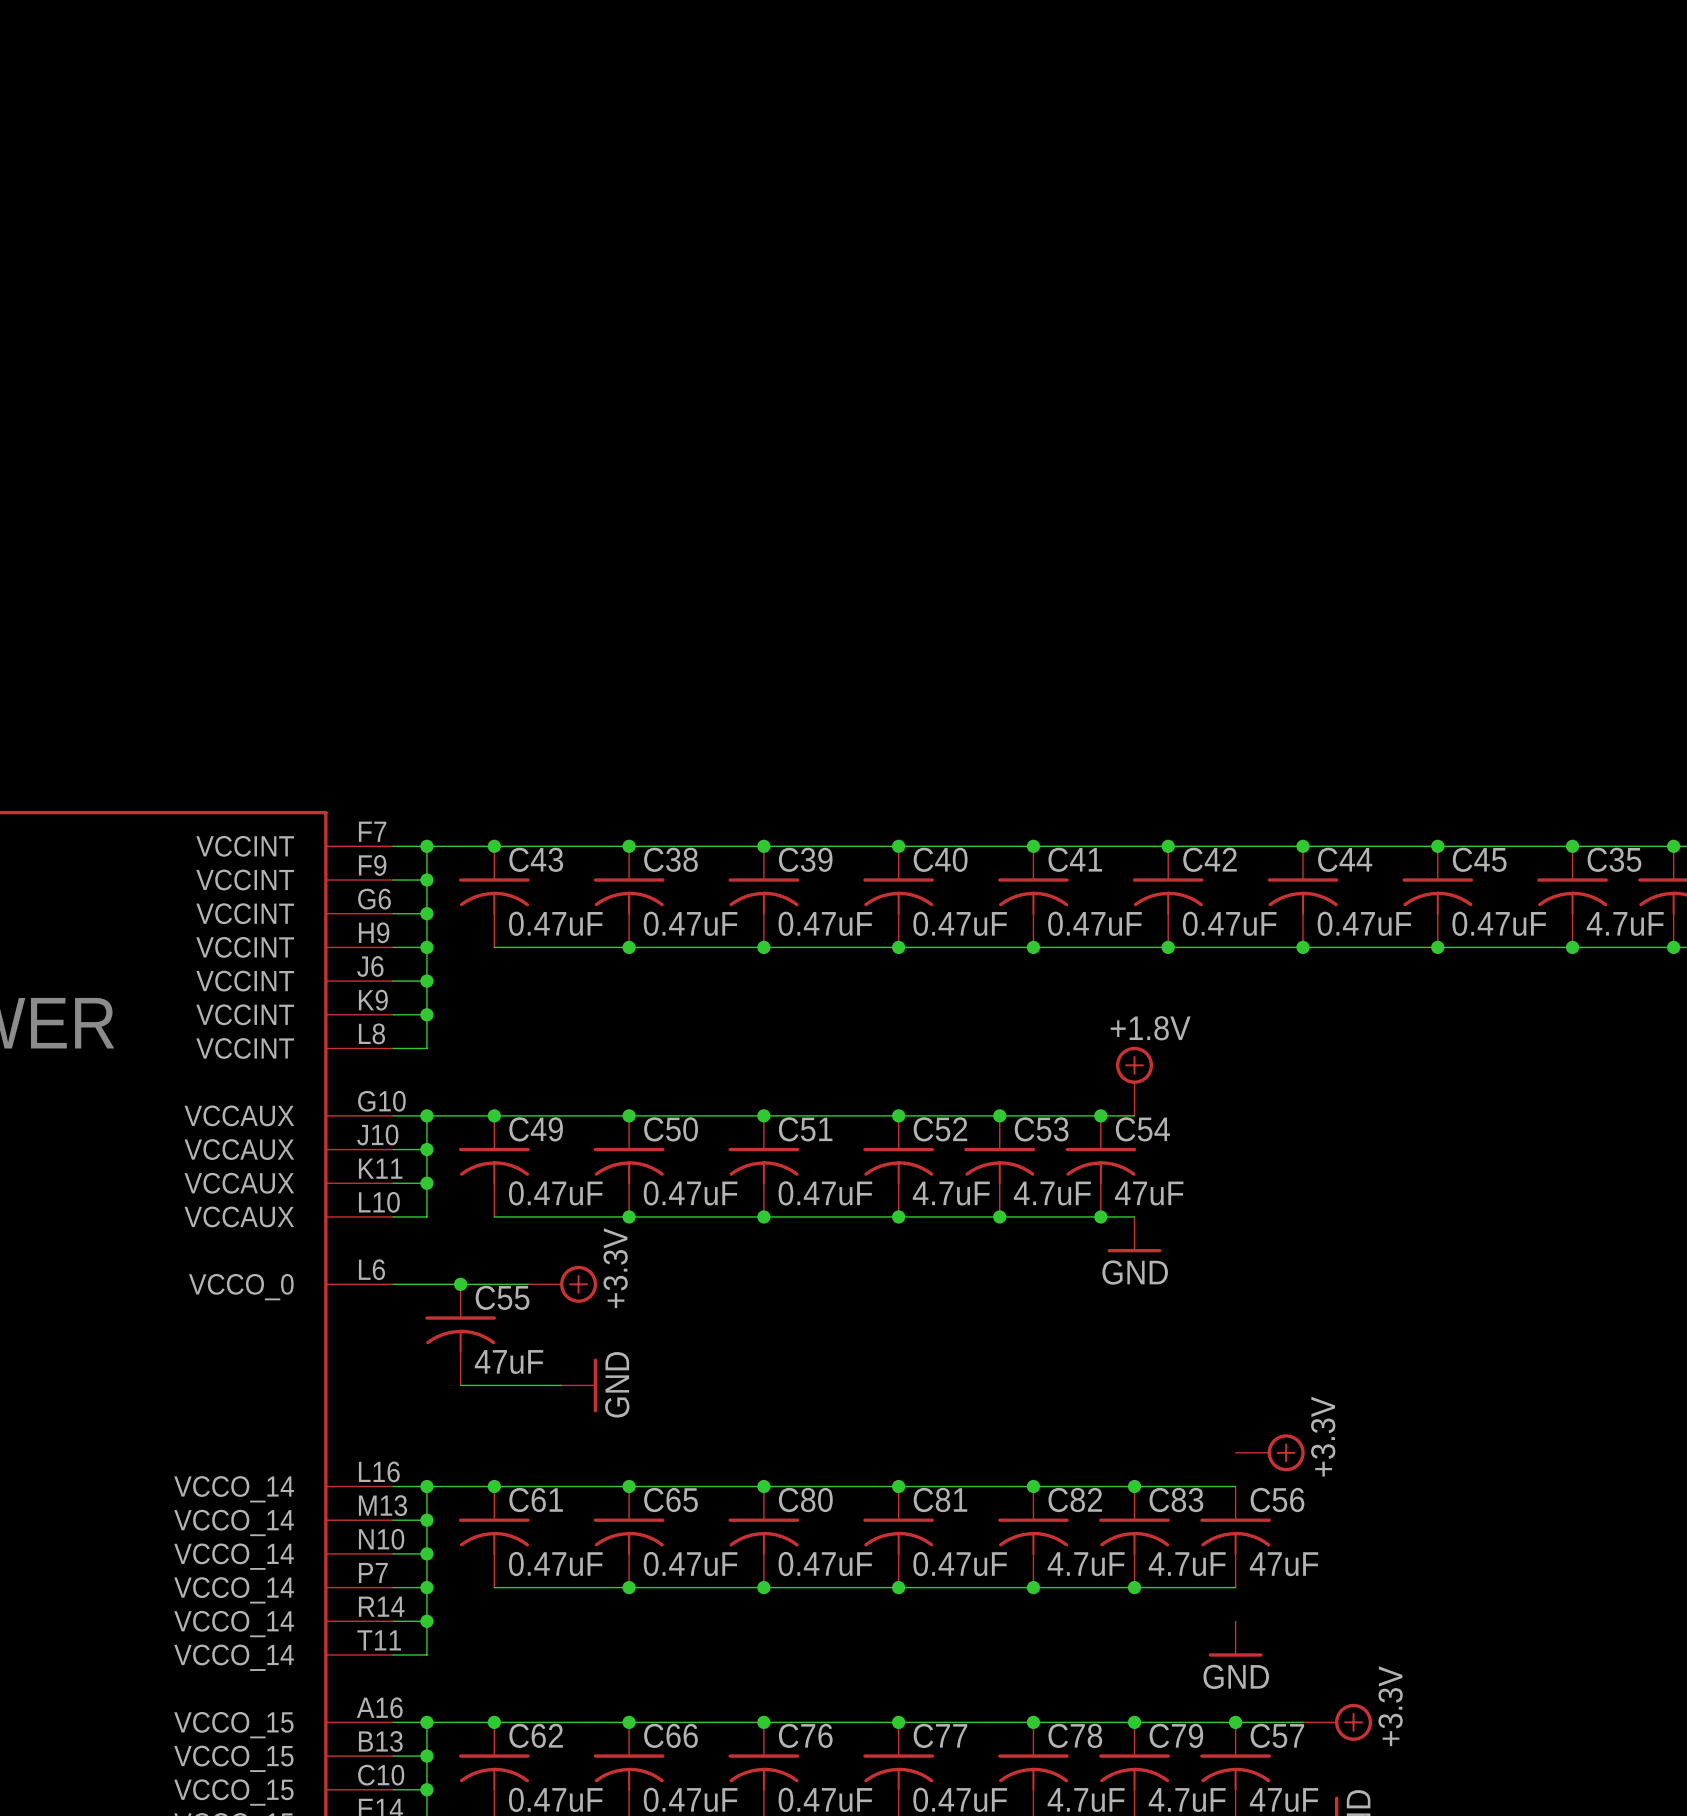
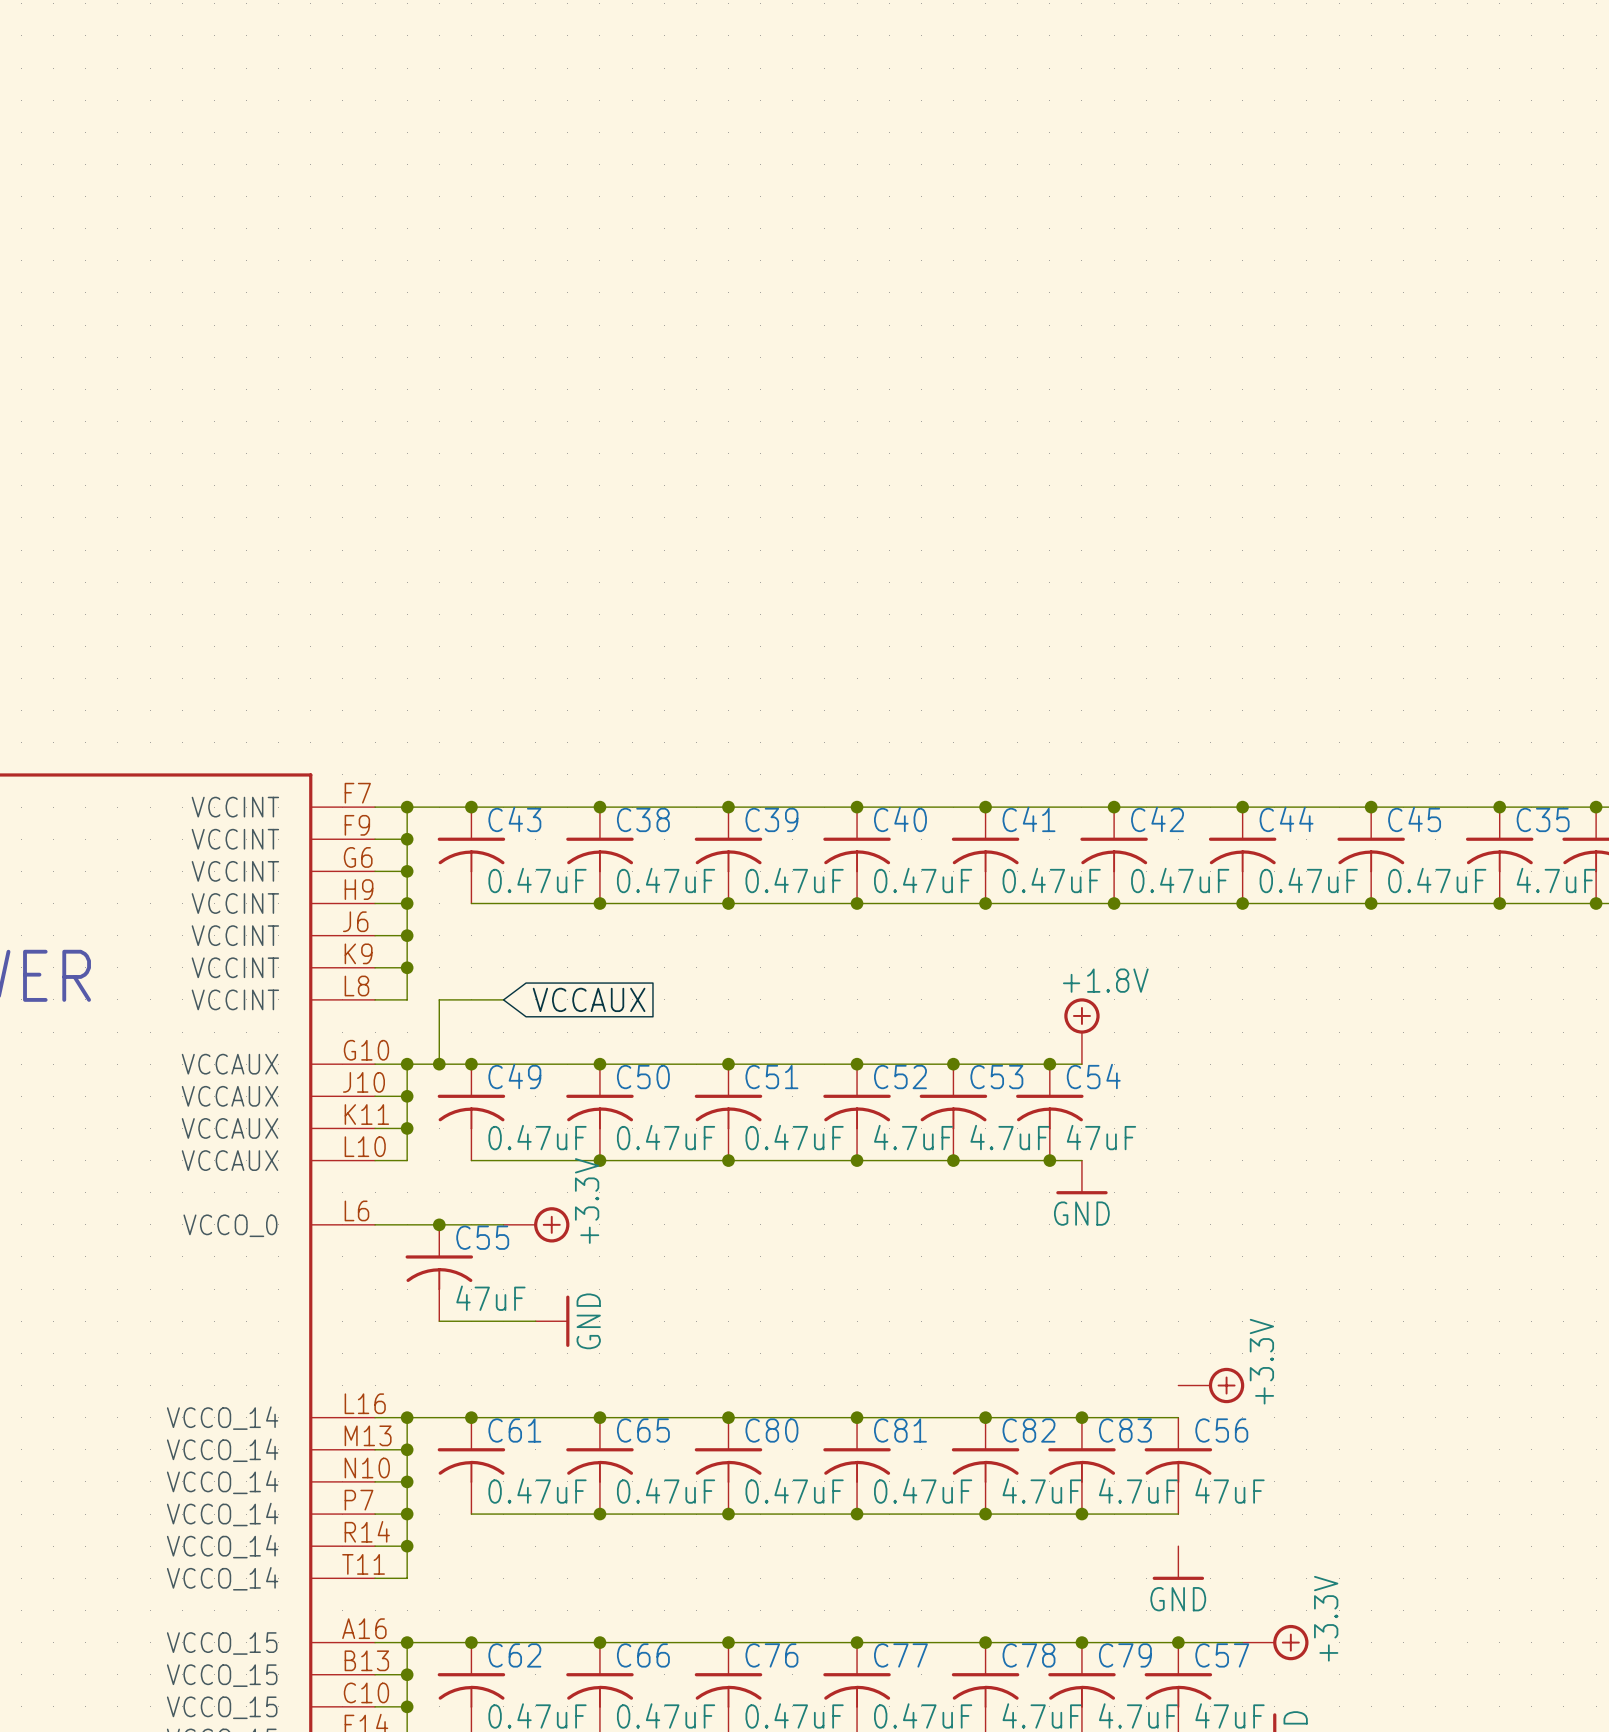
wire: none -> (503, 999) (439, 999) (439, 1064)
global label: none -> VCCAUX (589, 999)
junction: none -> (439, 1064)

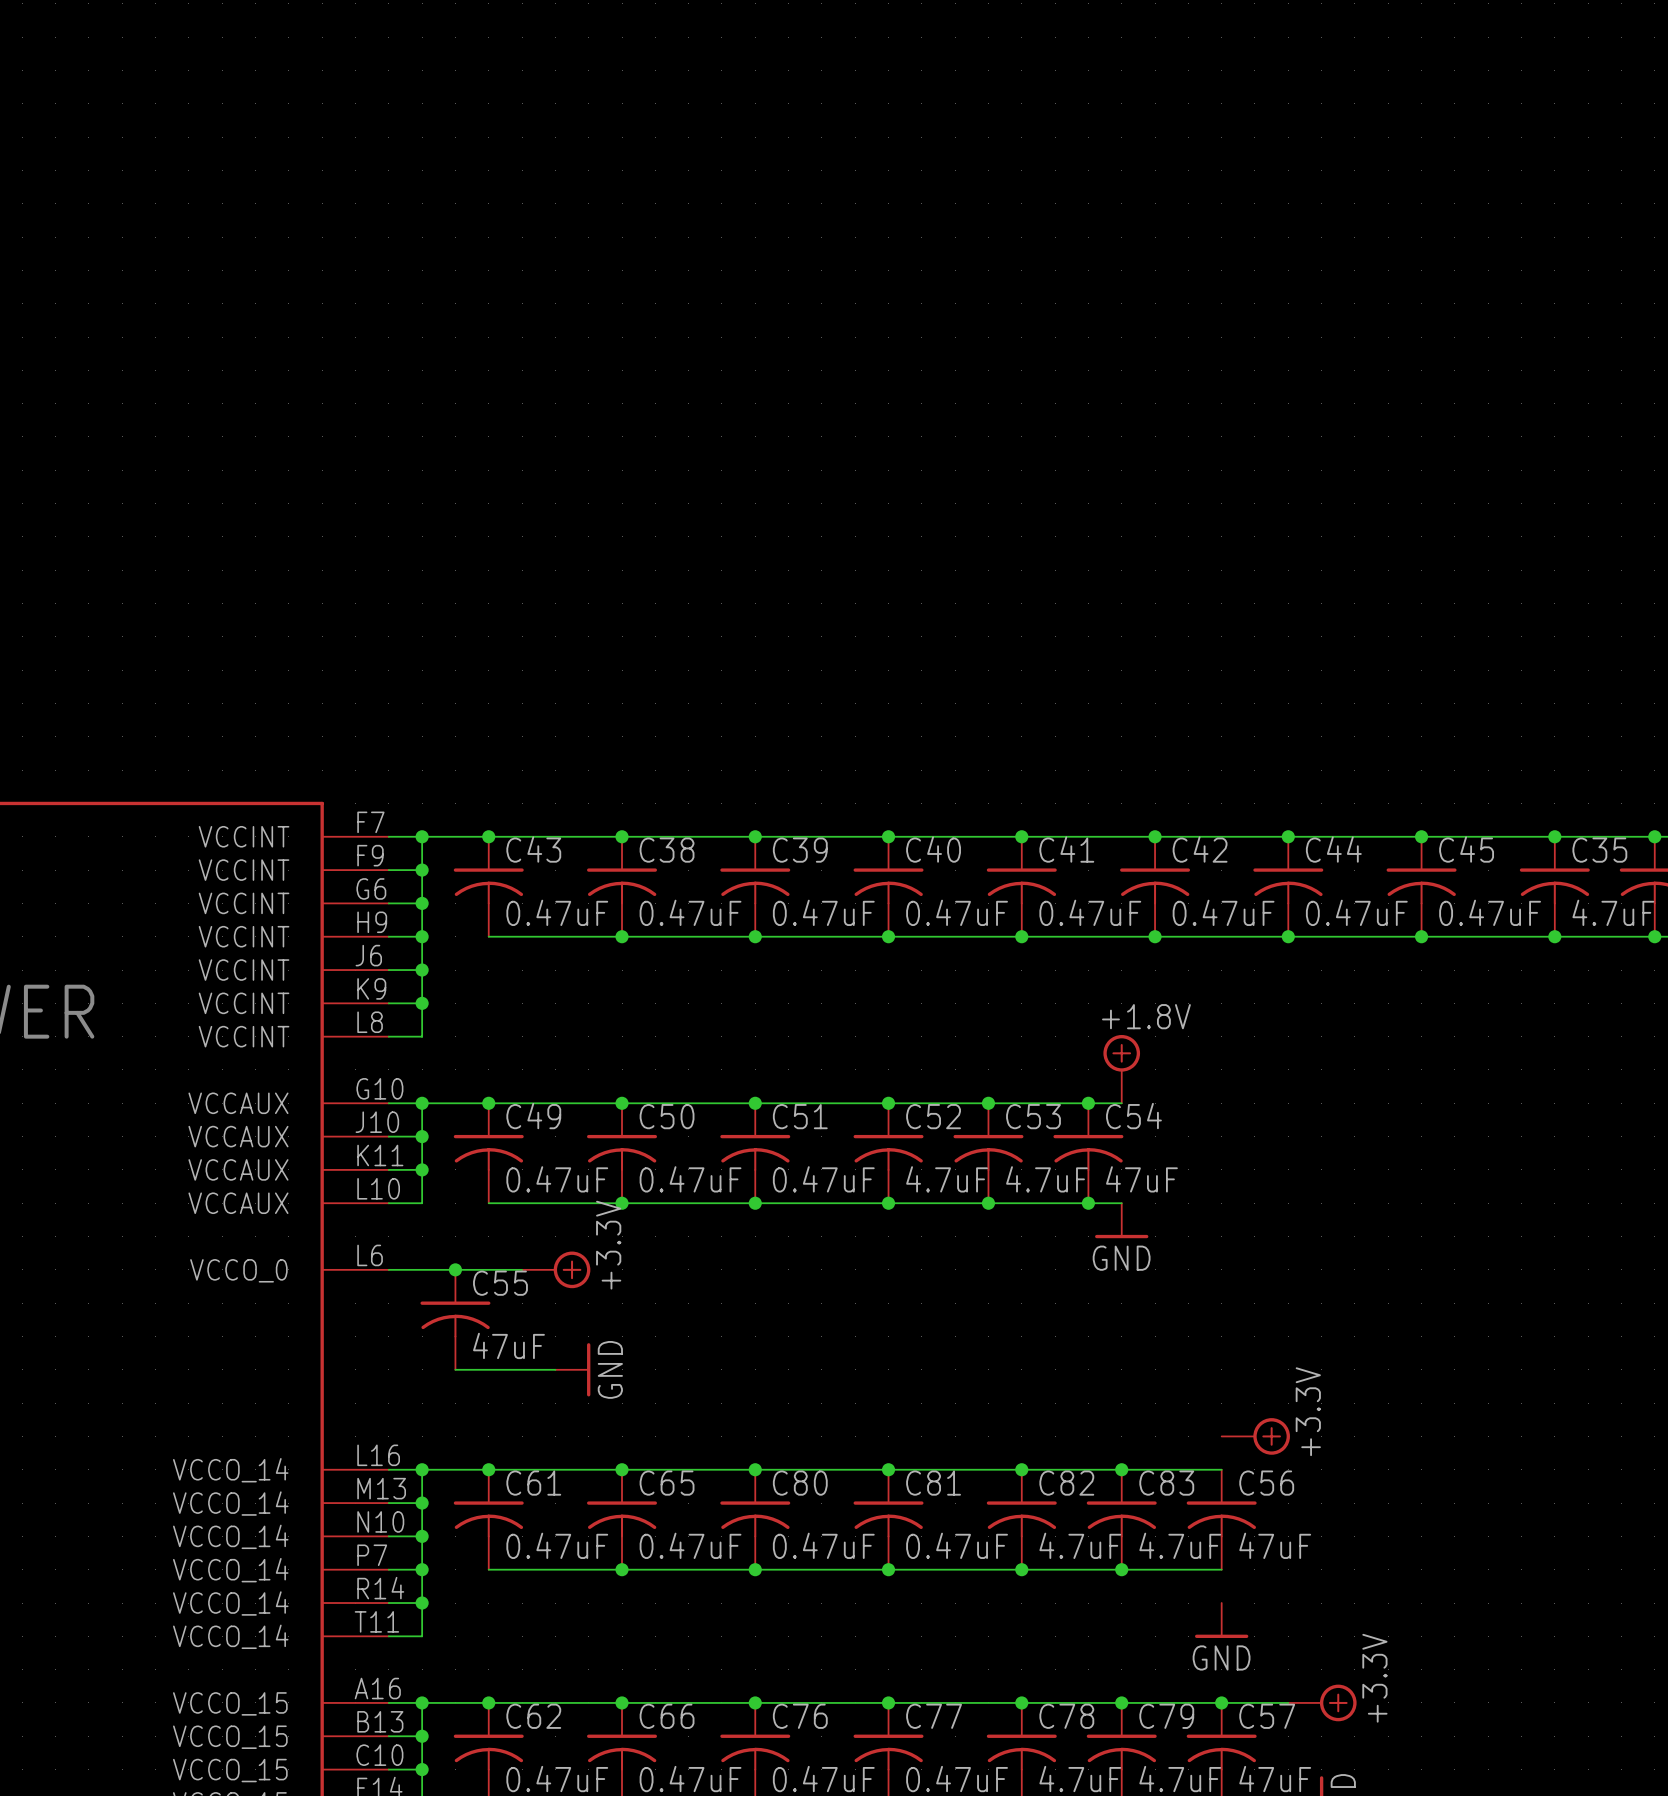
wire: (503, 999) (439, 999) (439, 1064) -> none
global label: VCCAUX (589, 999) -> none
junction: (439, 1064) -> none

